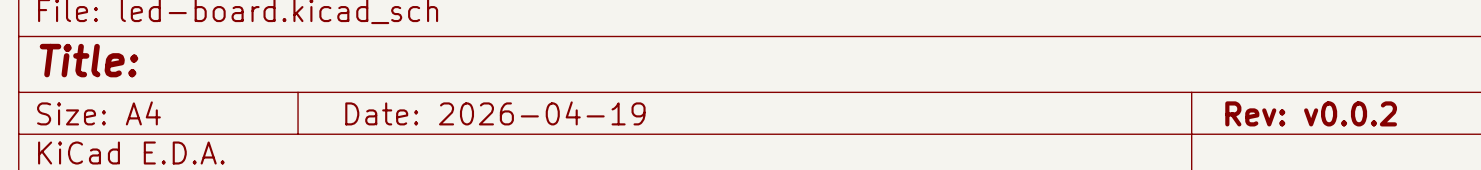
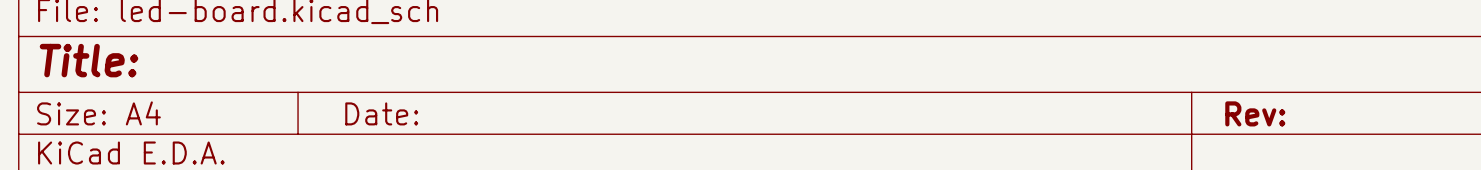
title block: Date: 2026-04-19 (495, 113) -> Date: (381, 113)
title block: Rev: v0.0.2 (1311, 113) -> Rev: (1255, 113)

